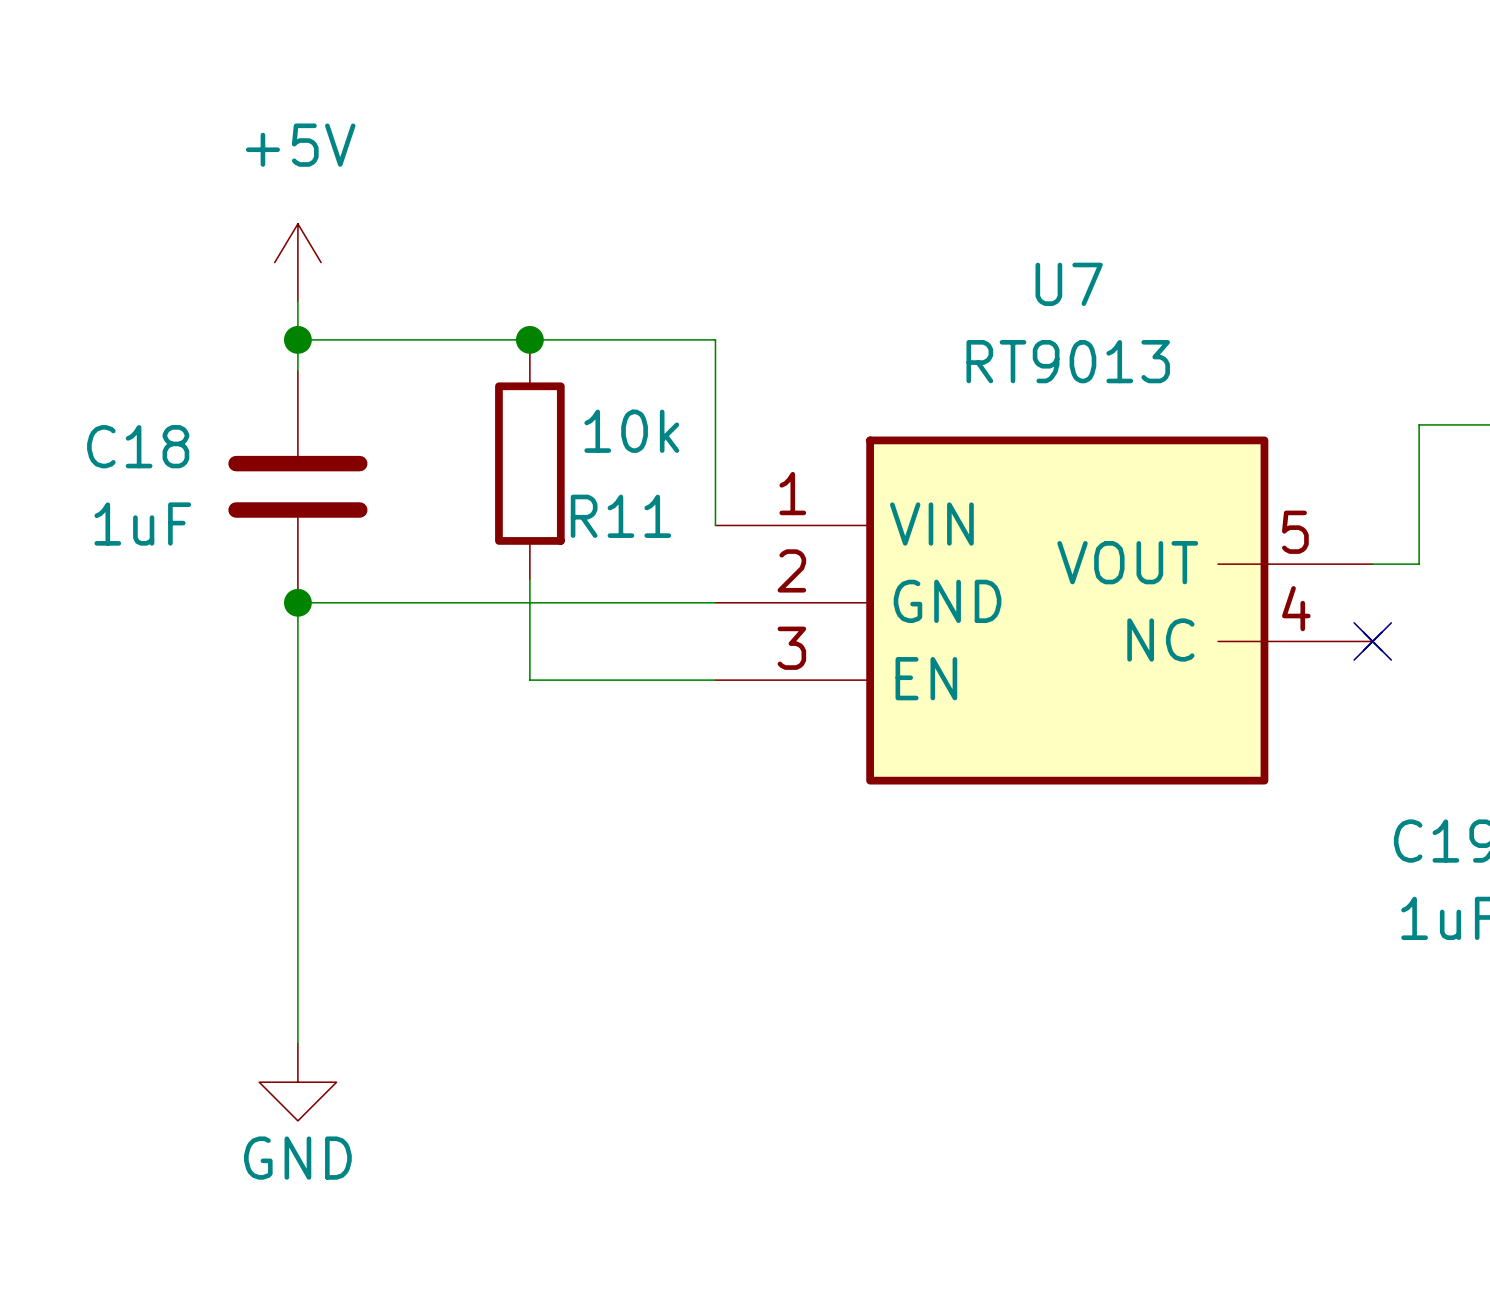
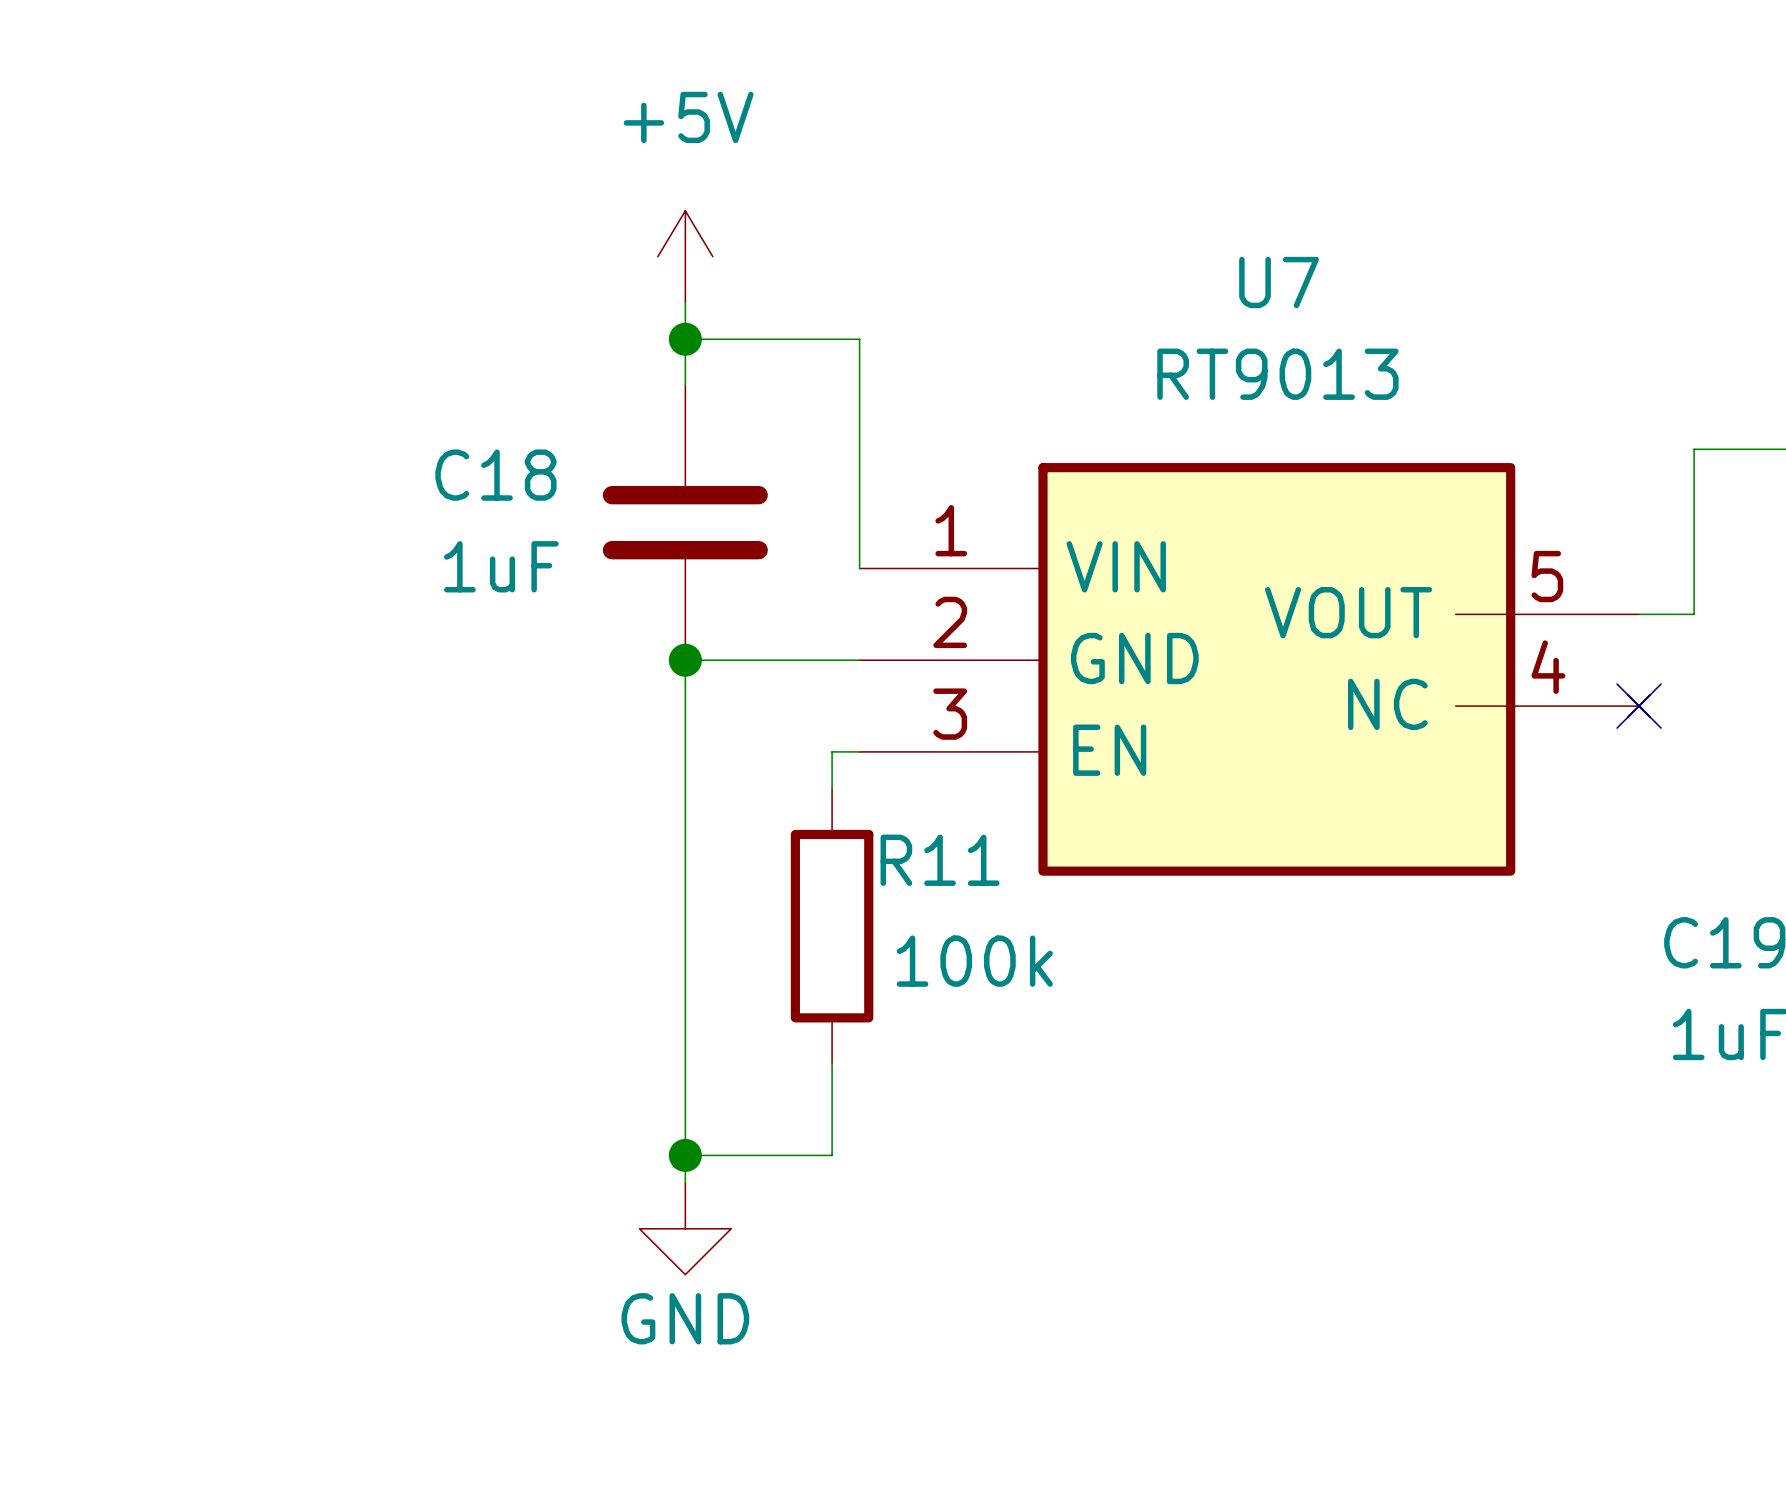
power symbol position: +5V (297, 262) -> +5V (685, 256)
wire: (297, 301) (297, 370) -> (685, 302) (685, 385)
wire: (297, 339) (715, 339) -> (685, 339) (859, 339) (859, 348)
junction: (297, 339) -> none
junction position: (529, 339) -> (685, 339)
R11 value: 10k (631, 431) -> 100k (974, 961)
R11 position: (529, 463) -> (832, 926)
C18 position: (297, 486) -> (685, 522)
R11 name position: R11 (620, 516) -> R11 (940, 860)
wire: (529, 579) (529, 680) (692, 680) -> (832, 788) (832, 751)
junction: (297, 602) -> none
wire: (568, 602) (297, 602) (297, 1043) -> (685, 660) (685, 1182)
junction: none -> (685, 660)
wire: none -> (832, 1063) (832, 1155) (685, 1155)
junction: none -> (685, 1155)
power symbol position: GND (297, 1082) -> GND (685, 1228)

